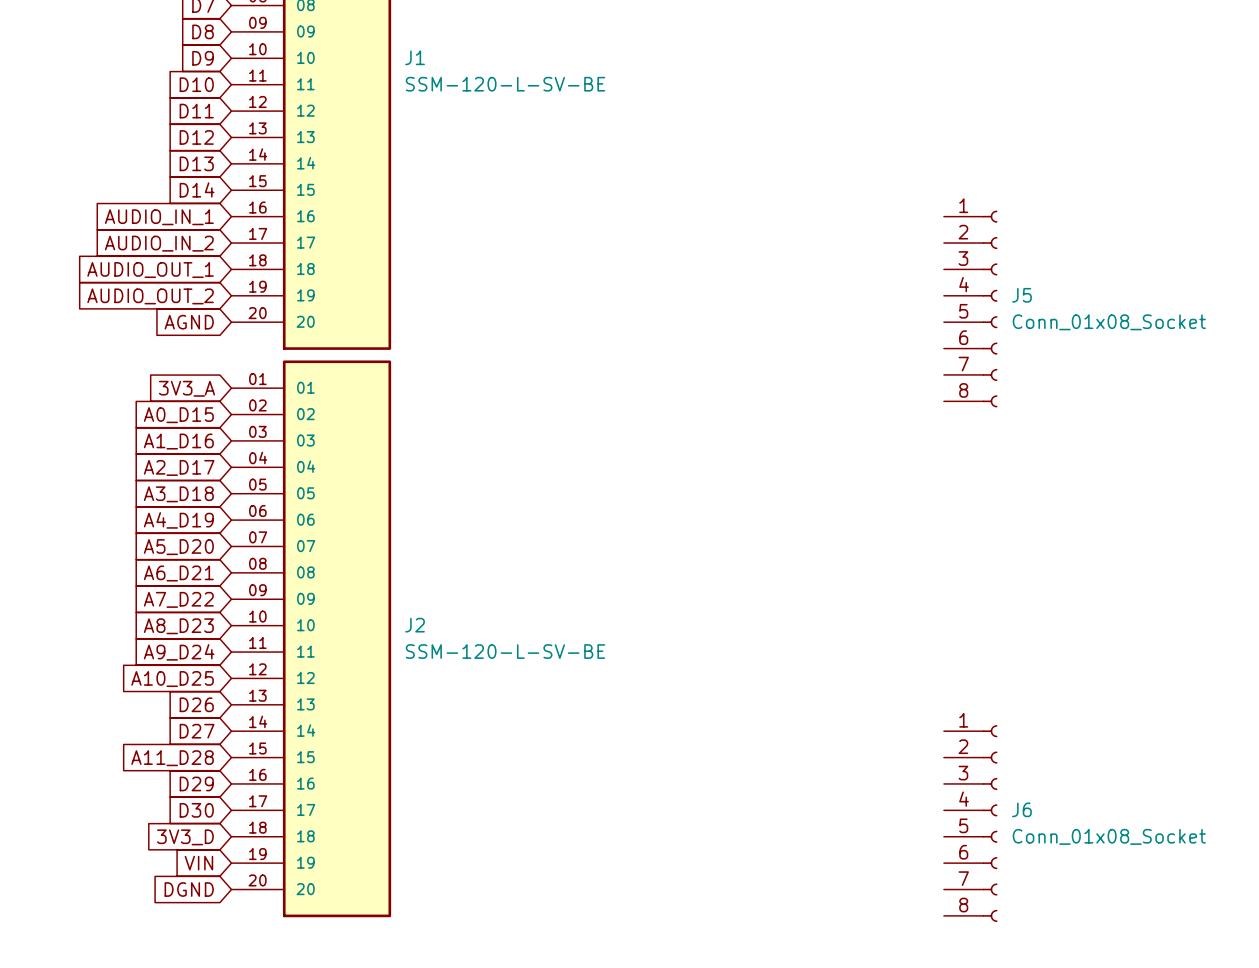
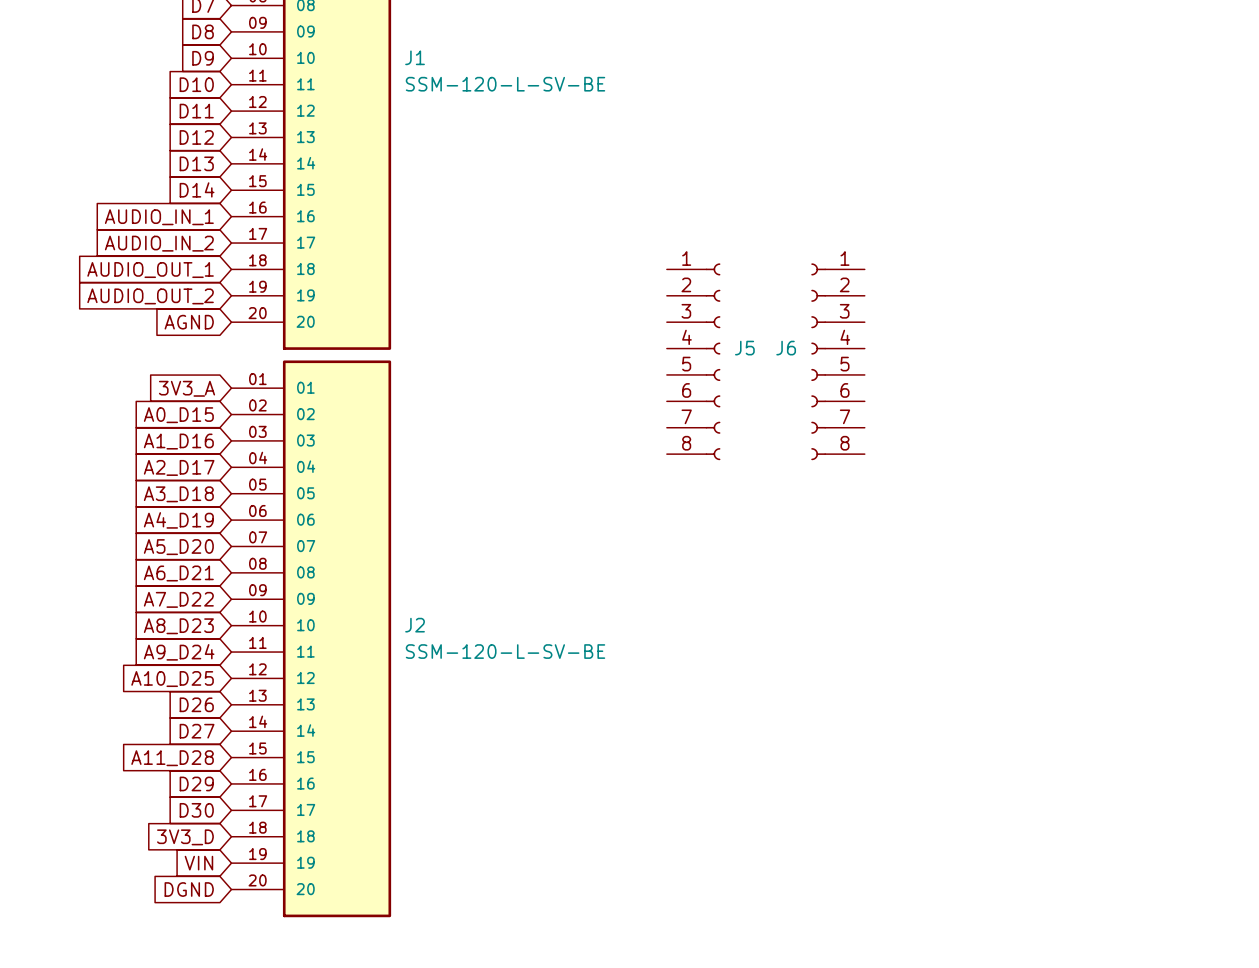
J5 position: (970, 308) -> (693, 361)
J5 value: Conn_01x08_Socket (1109, 322) -> none
J6 position: (970, 823) -> (837, 361)
J6 flip: as is (990, 823) -> left-right (818, 361)
J6 value: Conn_01x08_Socket (1109, 836) -> none

